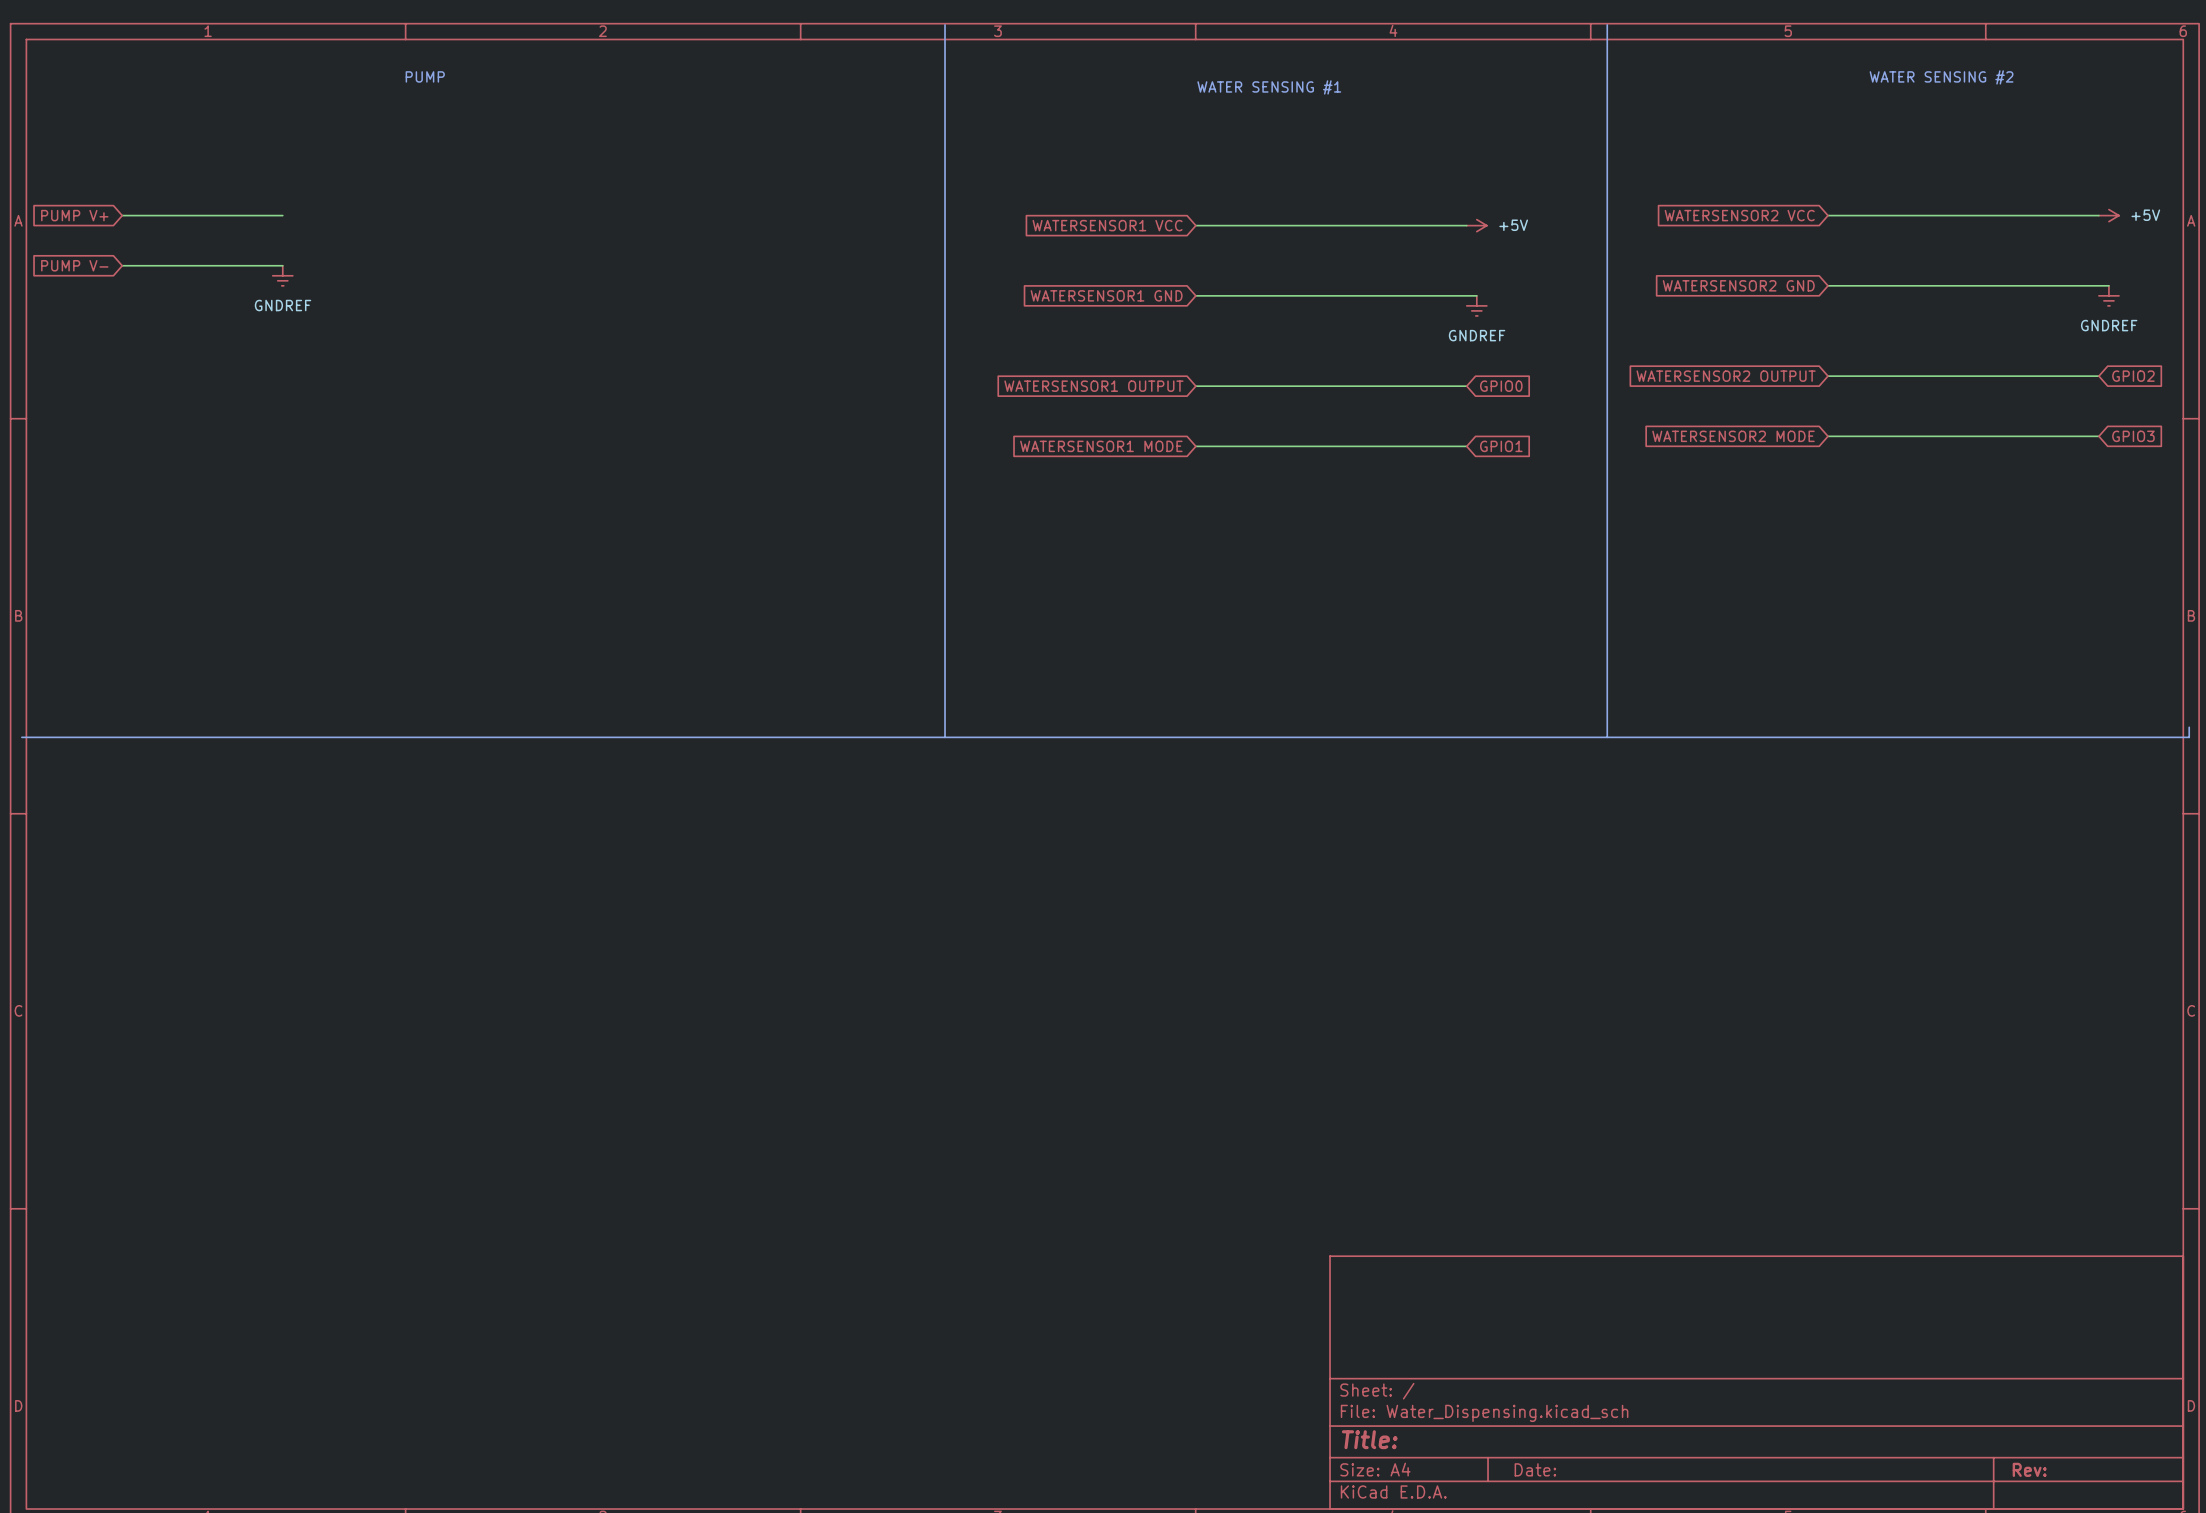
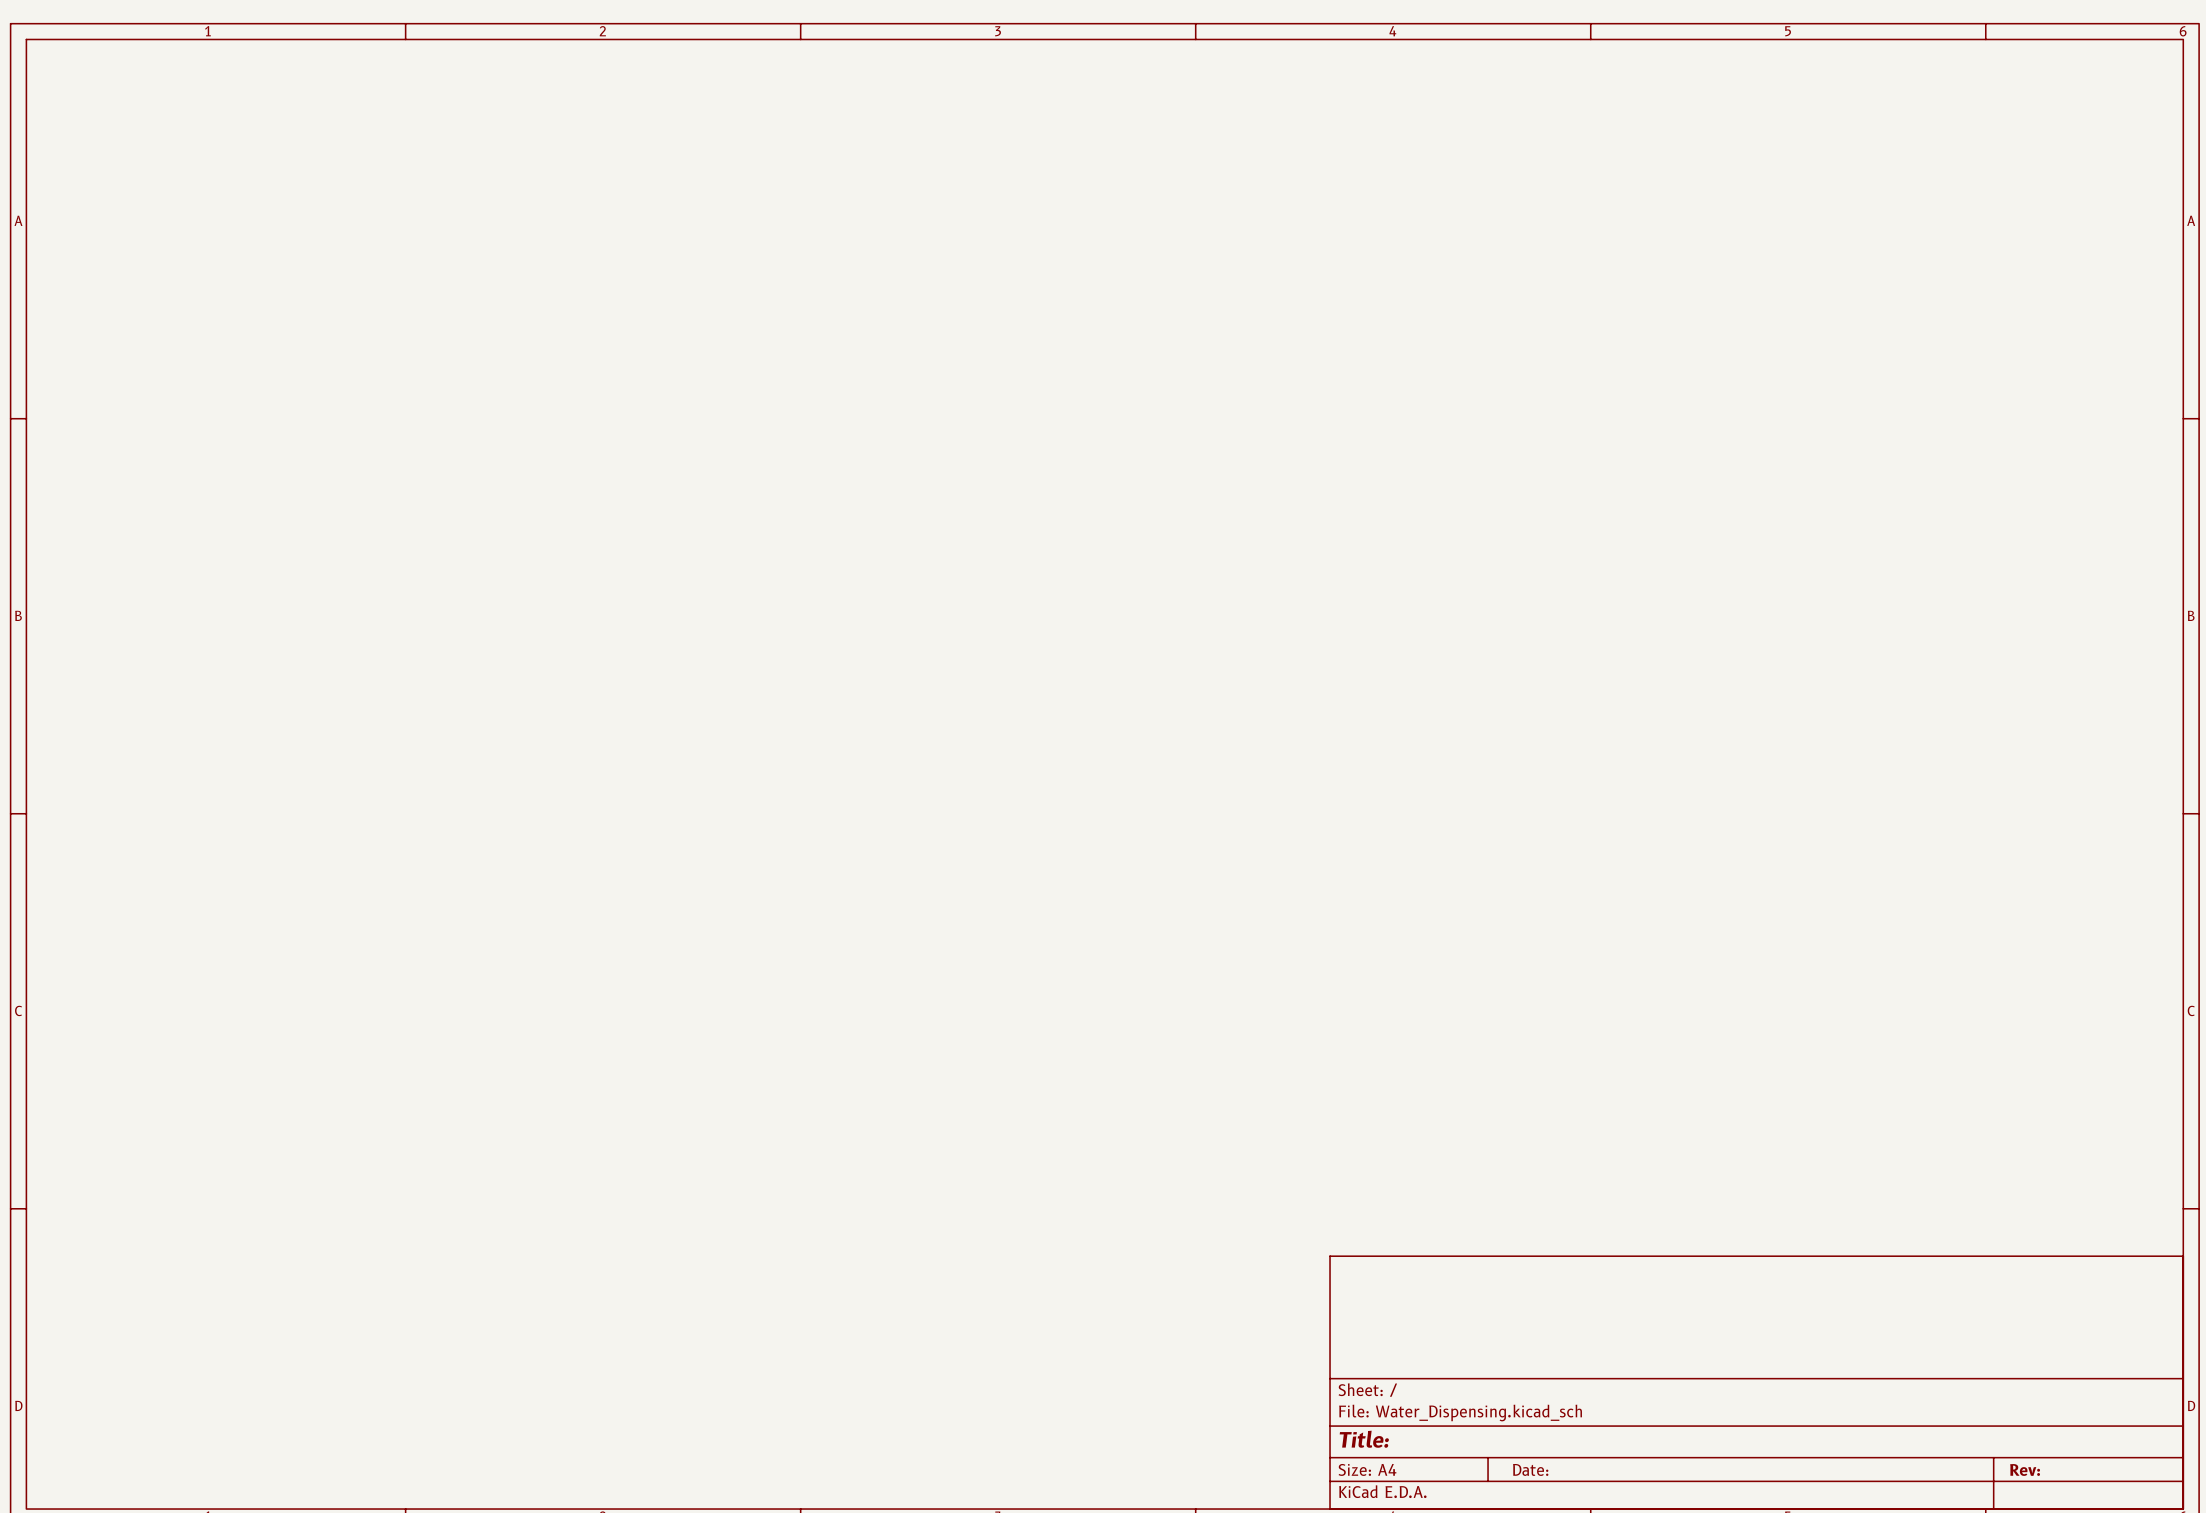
line: (945, 24) (945, 737) -> none
line: (1607, 24) (1607, 737) -> none
text: PUMP (425, 76) -> none
text: WATER SENSING #2 (1941, 77) -> none
text: WATER SENSING #1 (1269, 87) -> none
global label: PUMP V+ (74, 215) -> none
wire: (122, 215) (282, 215) -> none
global label: WATERSENSOR2 VCC (1739, 215) -> none
wire: (1827, 215) (2098, 215) -> none
power symbol: +5V (2108, 215) -> none
global label: WATERSENSOR1 VCC (1107, 225) -> none
wire: (1195, 225) (1466, 225) -> none
power symbol: +5V (1476, 225) -> none
global label: PUMP V- (74, 265) -> none
wire: (122, 265) (282, 265) -> none
power symbol: GNDREF (282, 275) -> none
global label: WATERSENSOR2 GND (1738, 285) -> none
wire: (1827, 285) (2108, 285) -> none
global label: WATERSENSOR1 GND (1106, 295) -> none
wire: (1195, 295) (1476, 295) -> none
power symbol: GNDREF (2108, 295) -> none
power symbol: GNDREF (1476, 305) -> none
global label: WATERSENSOR2 OUTPUT (1726, 376) -> none
wire: (1827, 376) (2098, 376) -> none
global label: GPIO2 (2133, 376) -> none
global label: WATERSENSOR1 OUTPUT (1093, 386) -> none
wire: (1195, 386) (1466, 386) -> none
global label: GPIO0 (1501, 386) -> none
global label: WATERSENSOR2 MODE (1733, 436) -> none
wire: (1827, 436) (2098, 436) -> none
global label: GPIO3 (2133, 436) -> none
global label: WATERSENSOR1 MODE (1101, 446) -> none
wire: (1195, 446) (1466, 446) -> none
global label: GPIO1 (1501, 446) -> none
line: (2189, 727) (2189, 737) (21, 737) -> none

